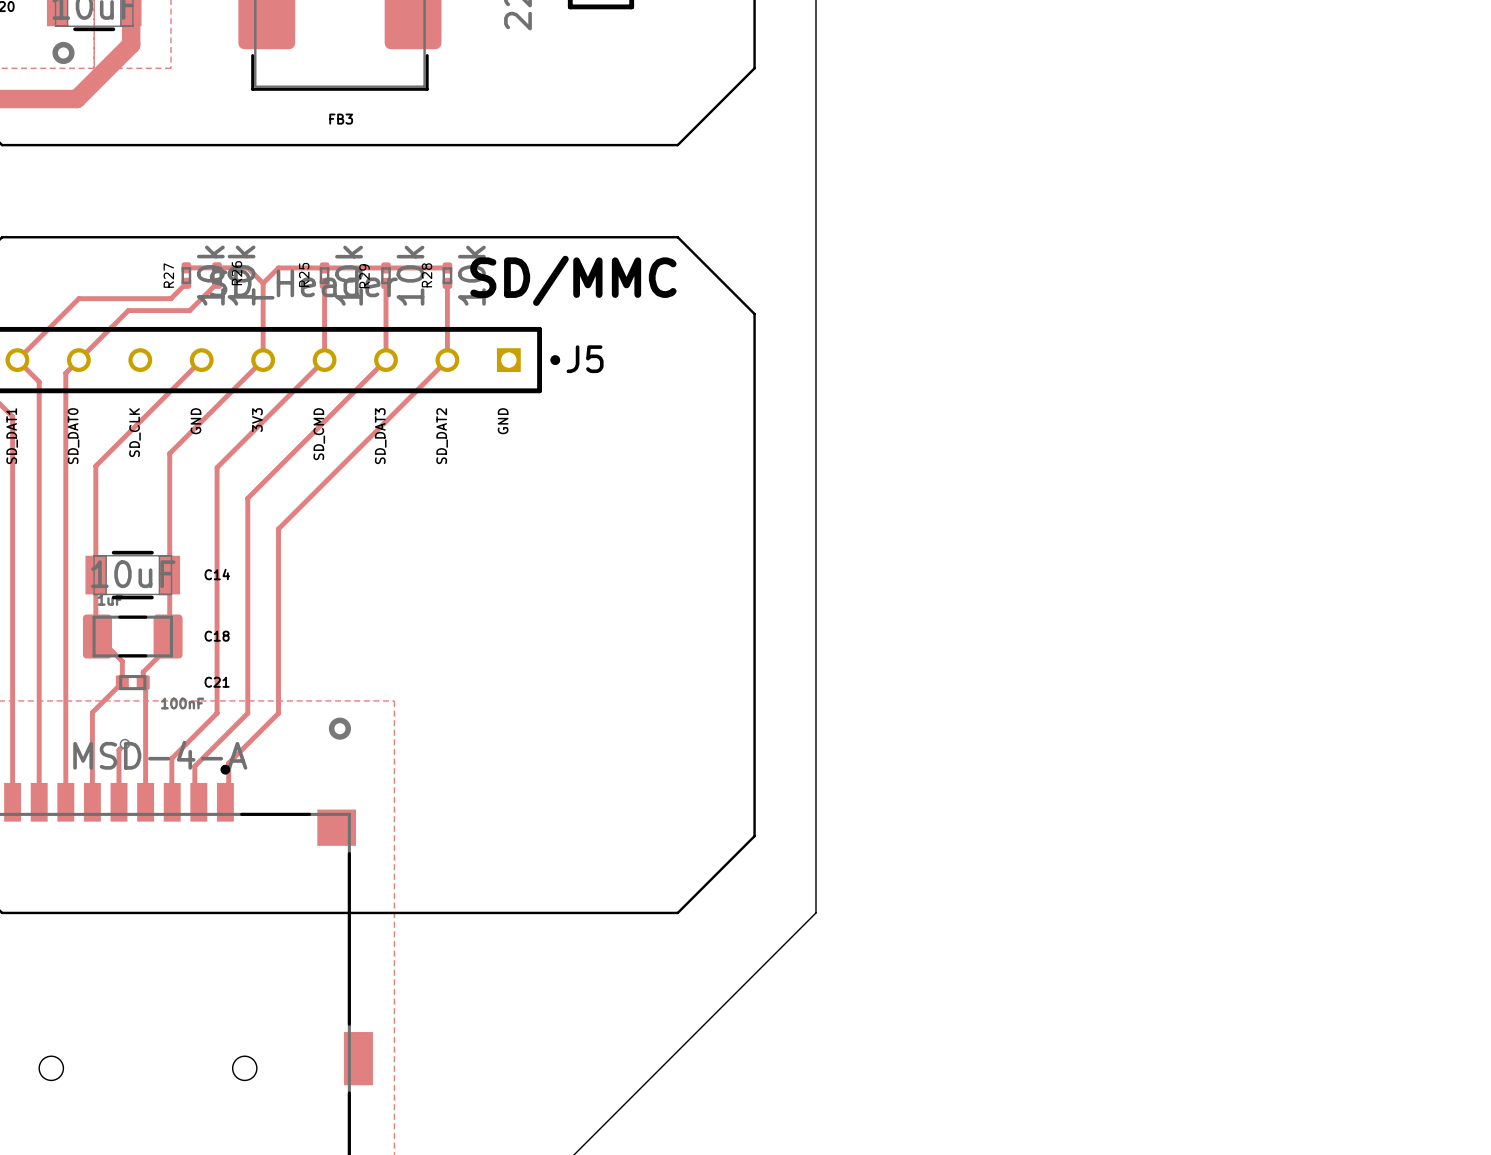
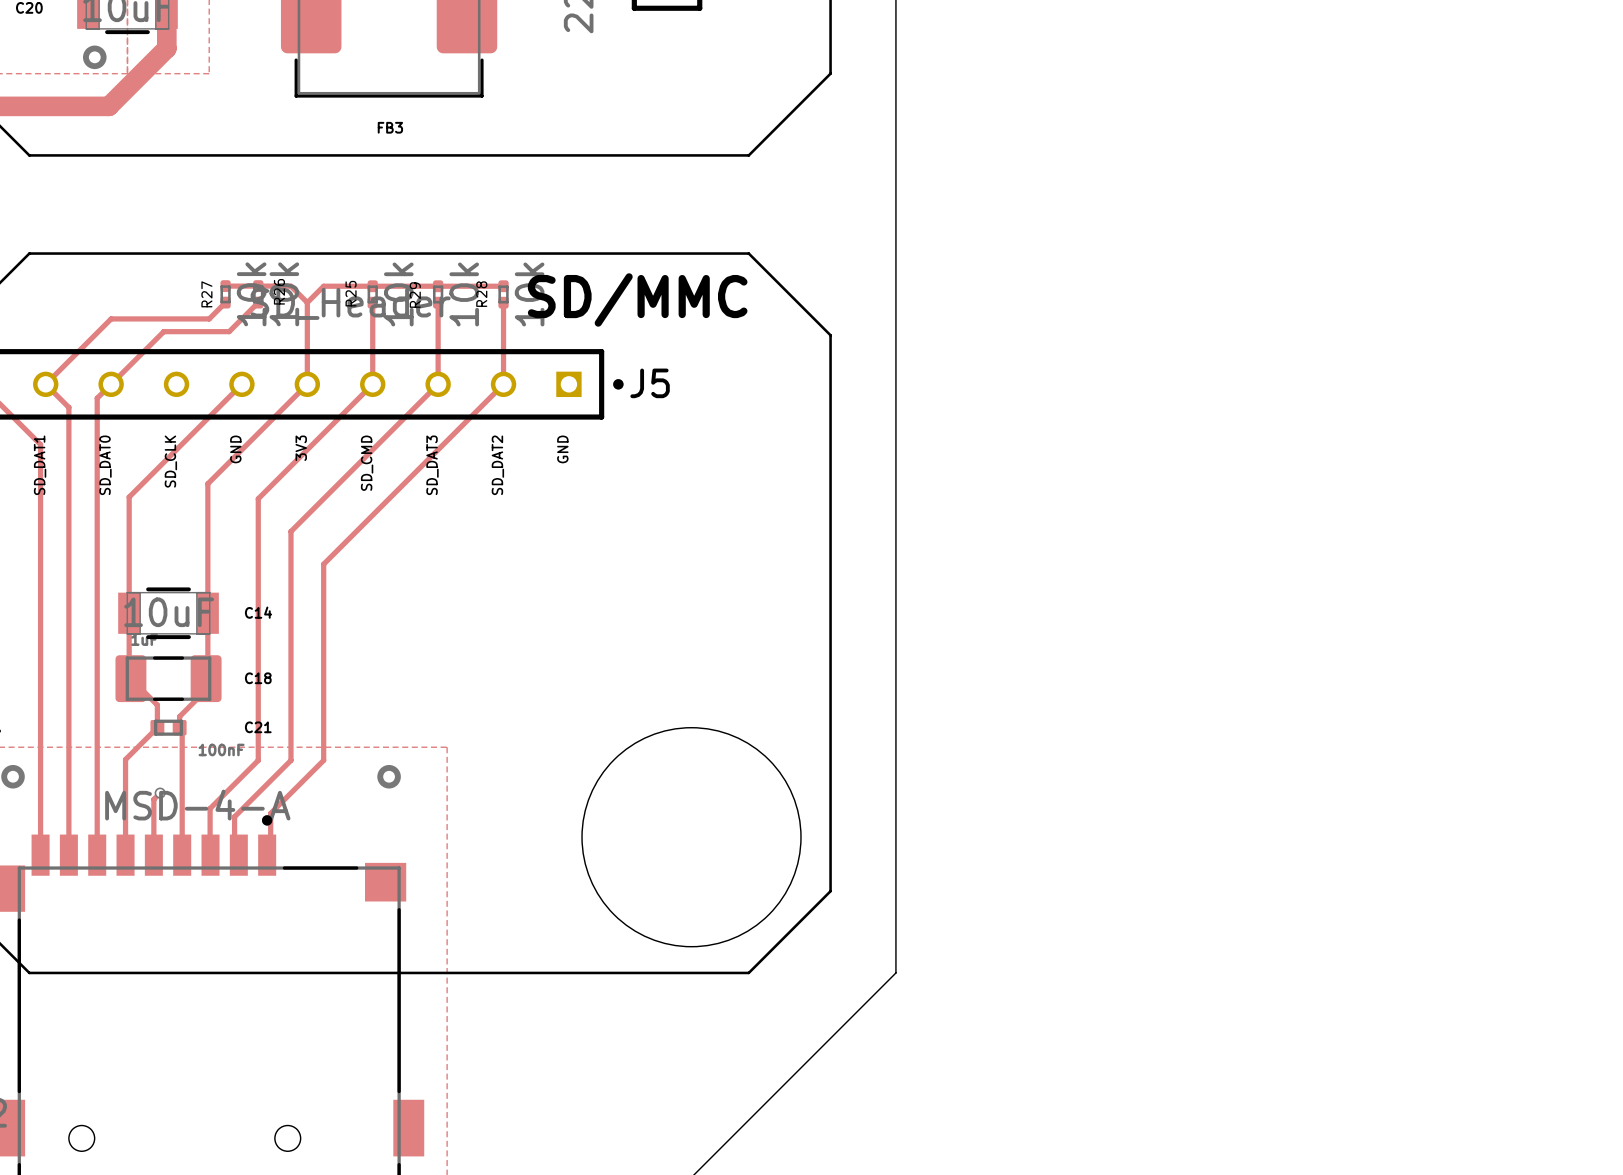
round board edge: none -> [581, 727, 802, 948]

